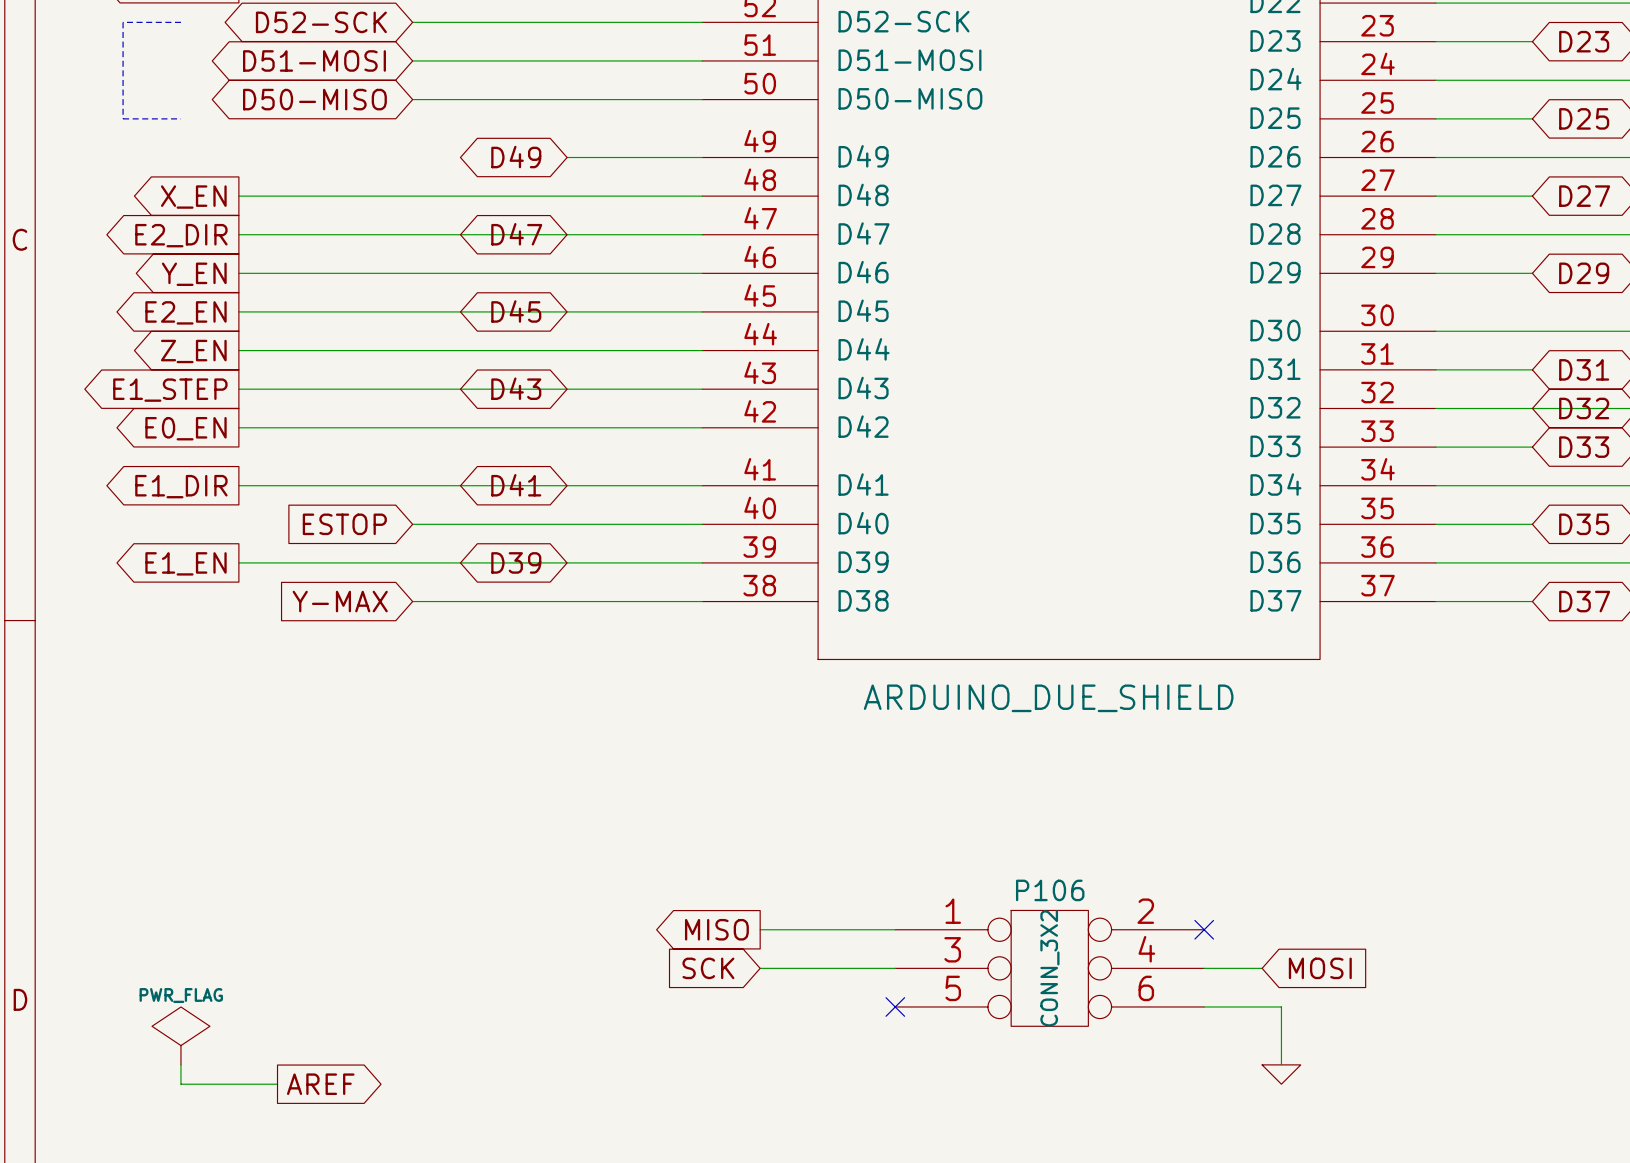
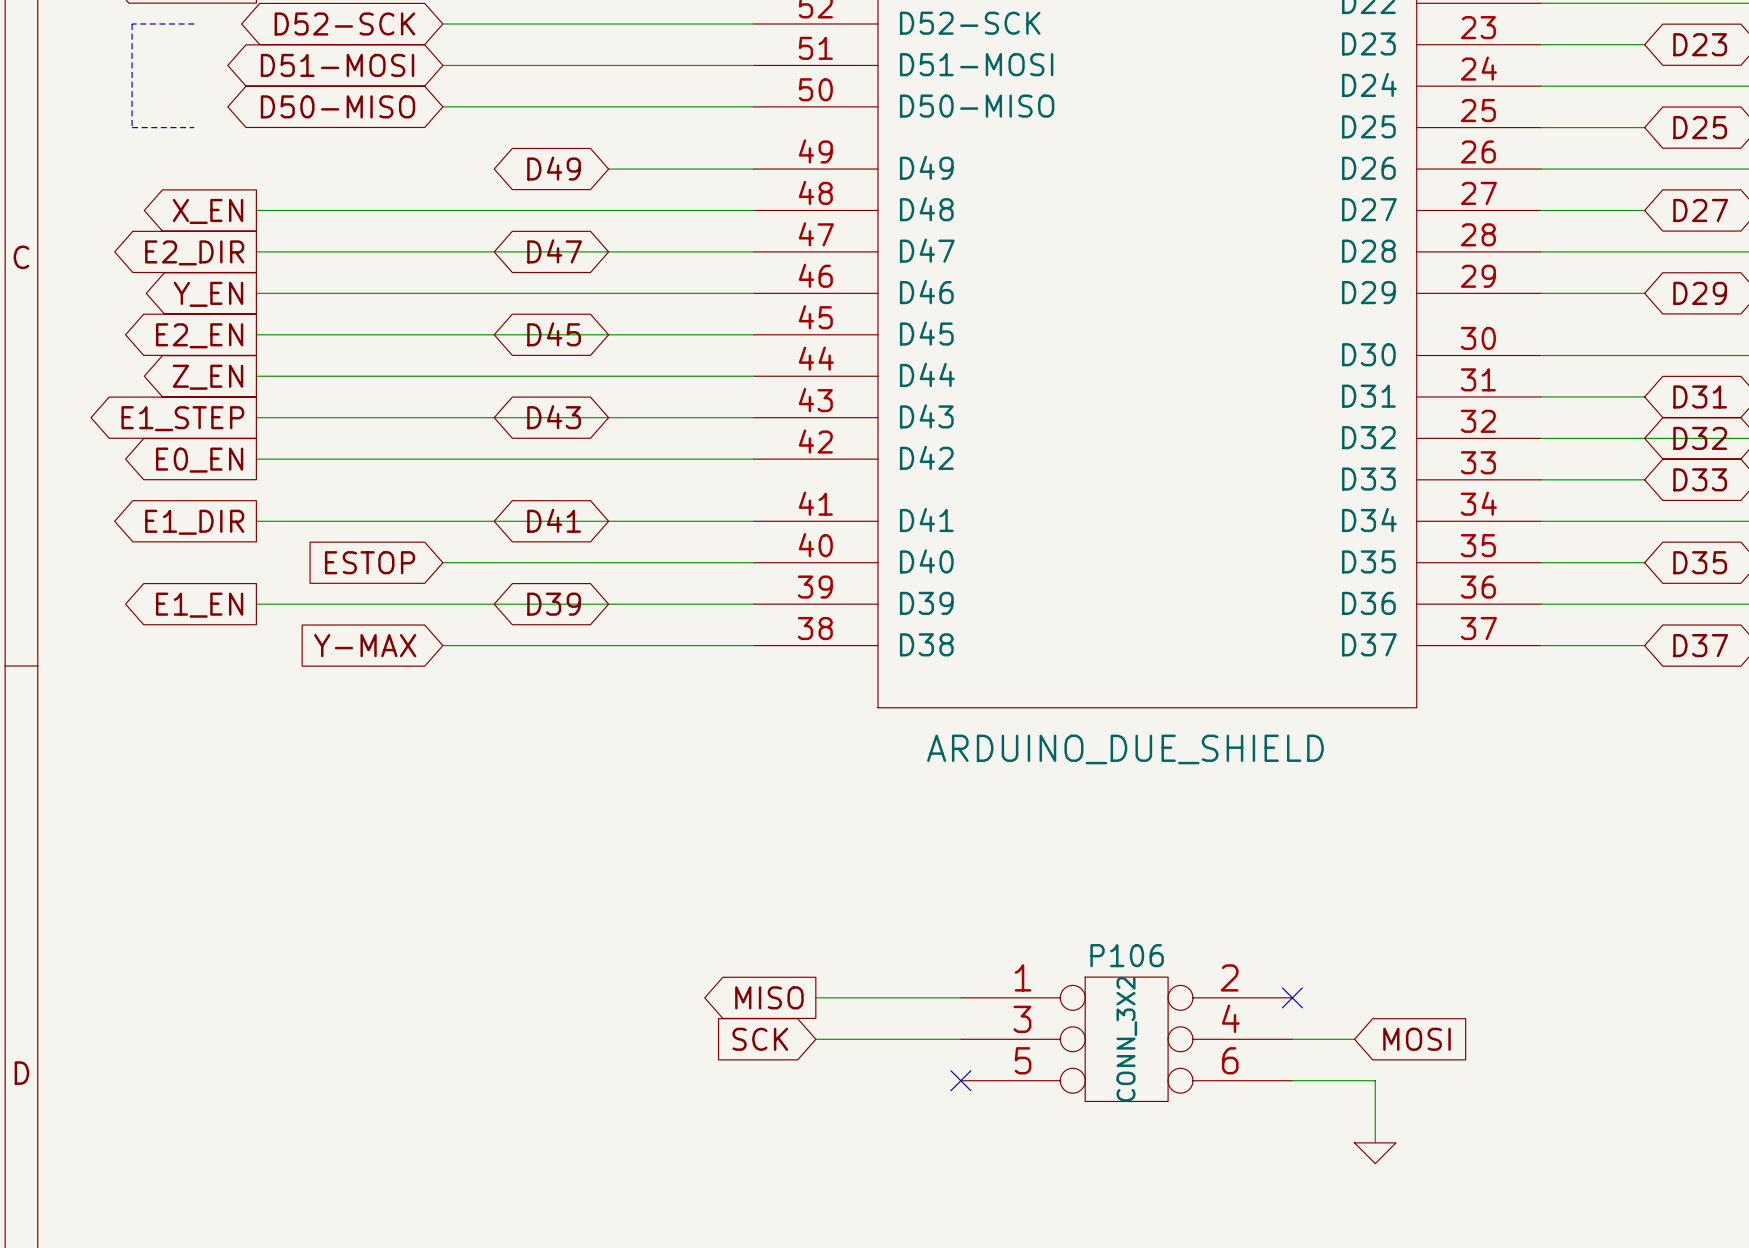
power symbol: PWR_FLAG (180, 1035) -> none
wire: (180, 1064) (180, 1084) (277, 1084) -> none
global label: AREF (320, 1084) -> none

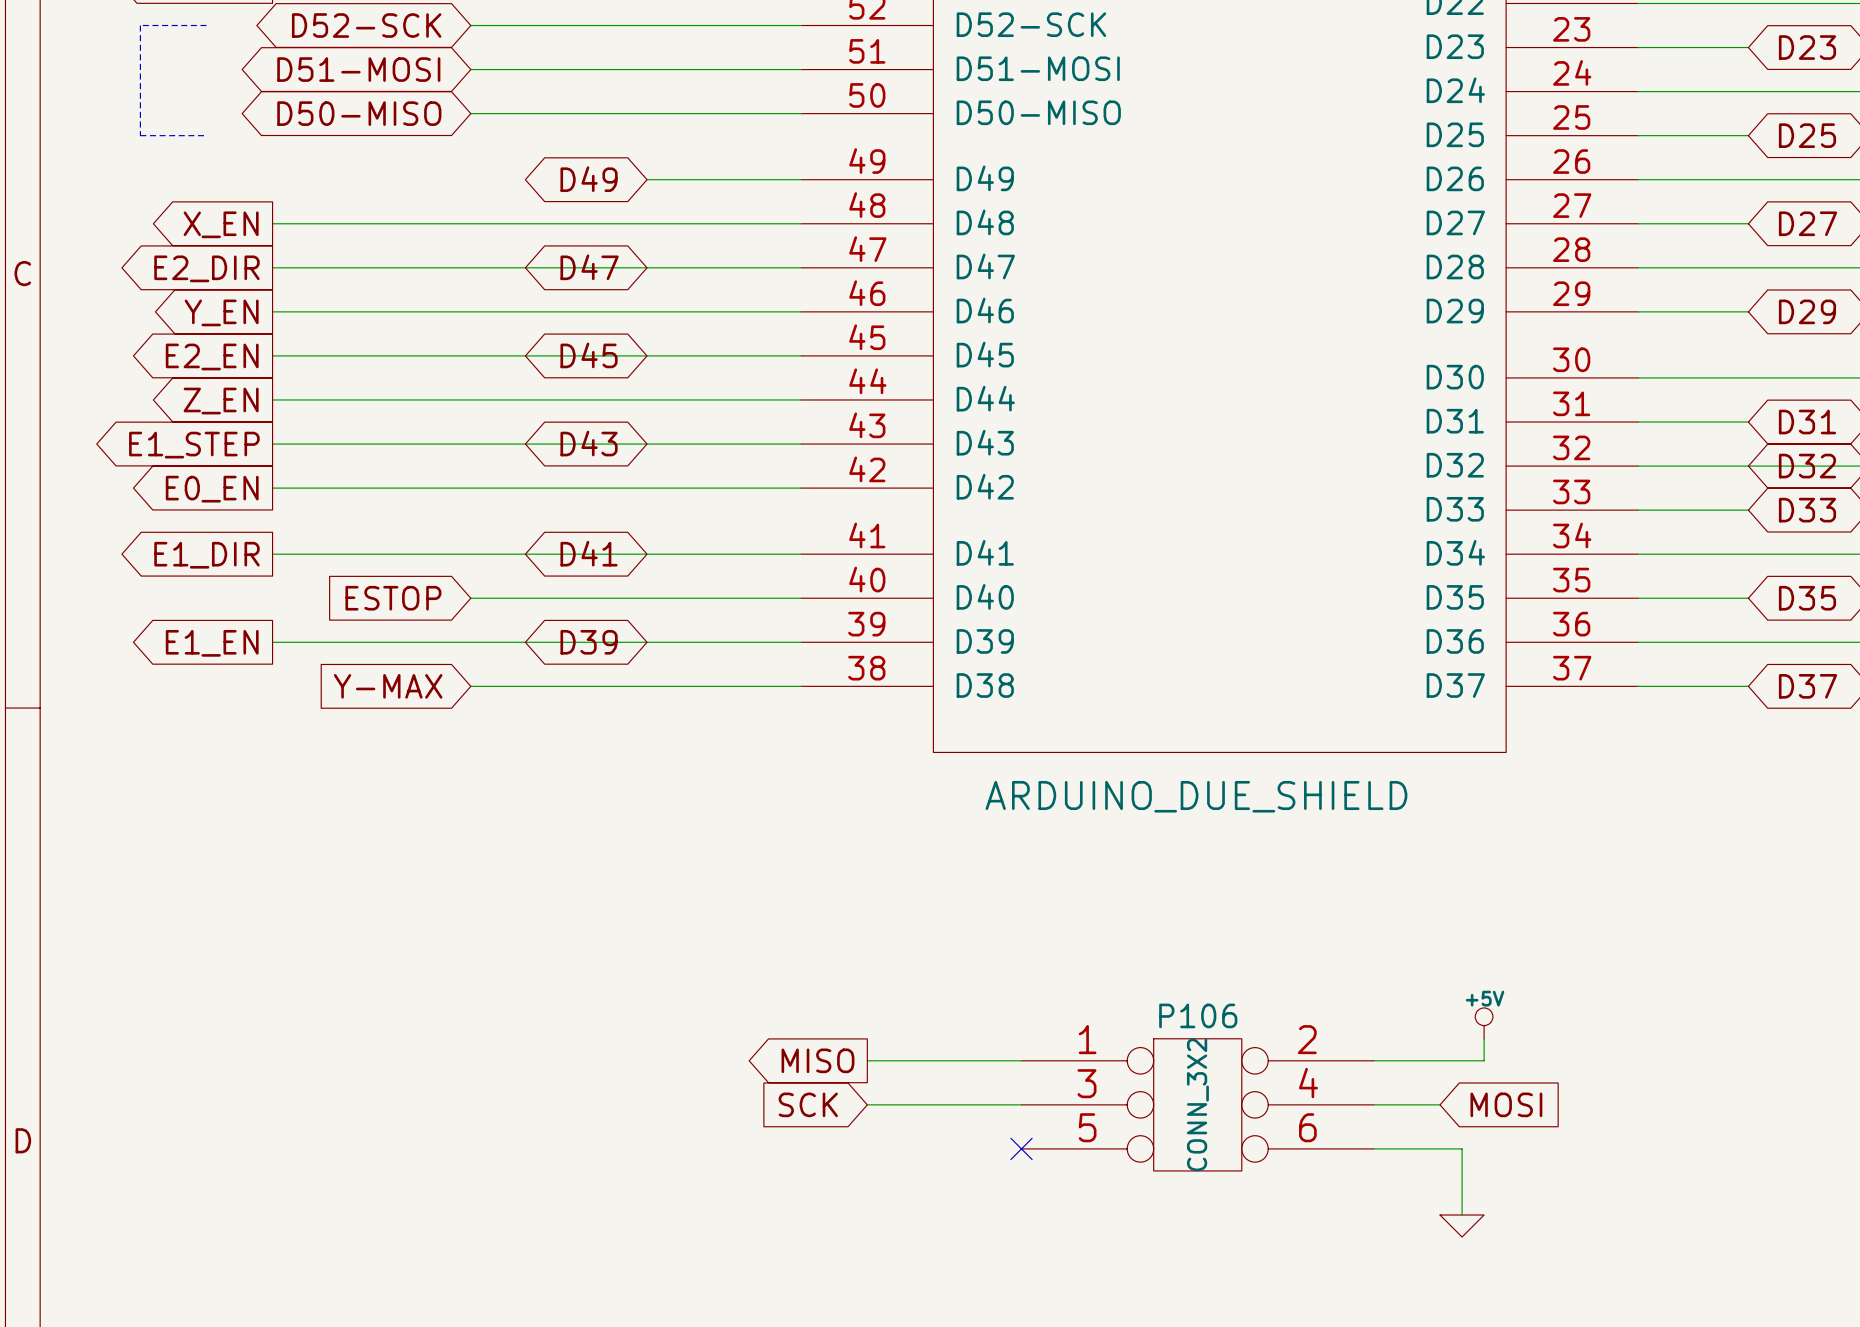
power symbol: none -> +5V (1484, 1023)
wire: none -> (1484, 1038) (1484, 1060) (1373, 1060)
no-connect mark: (1292, 997) -> none

